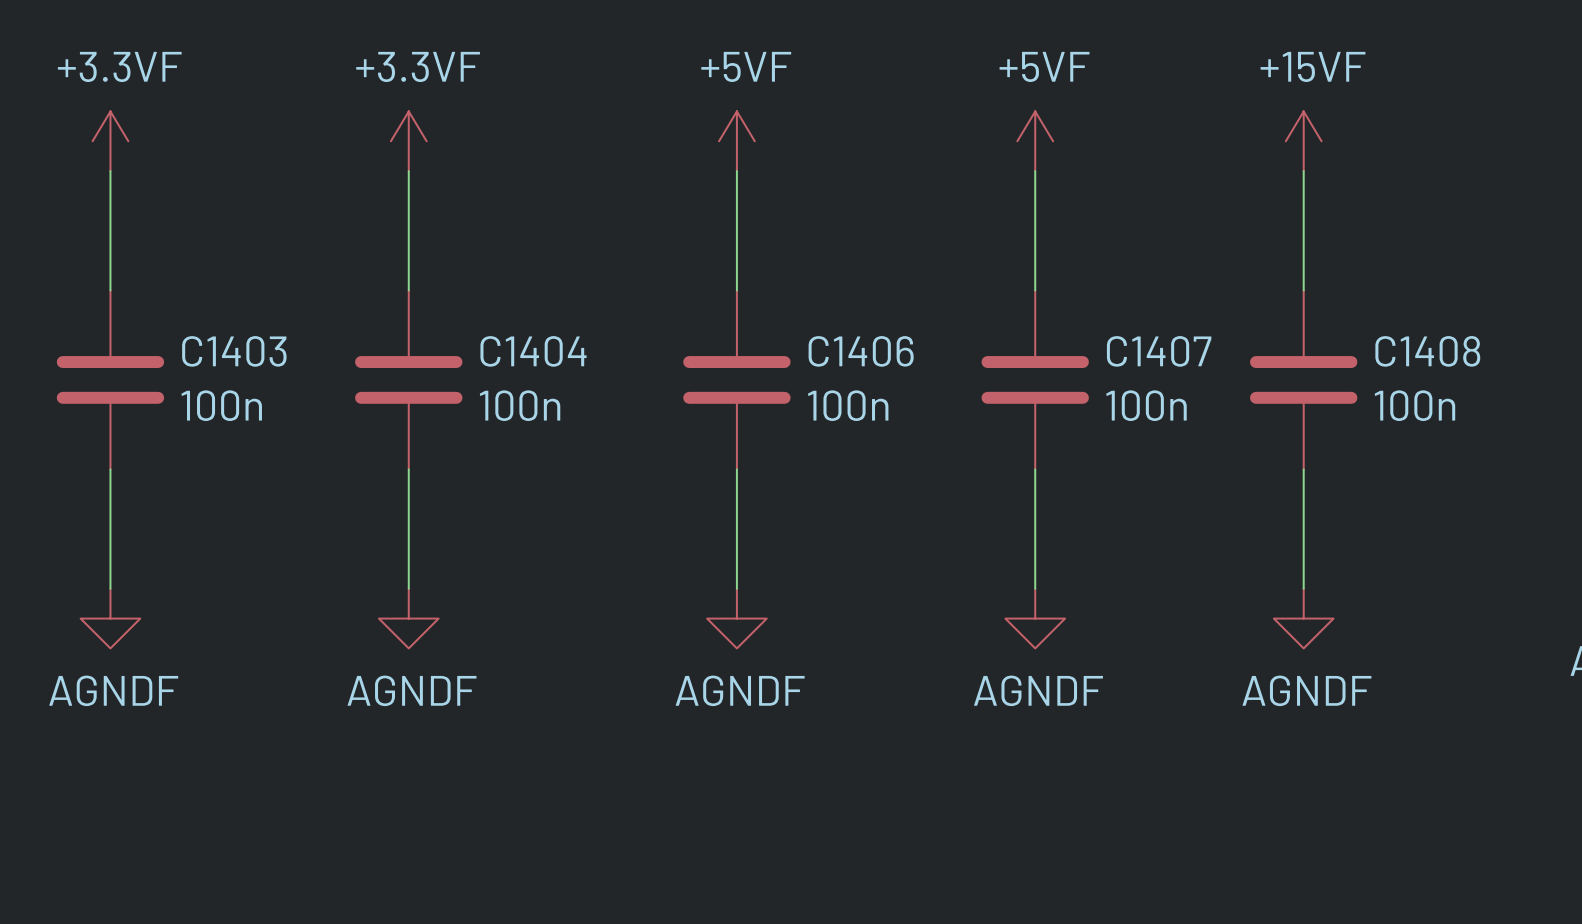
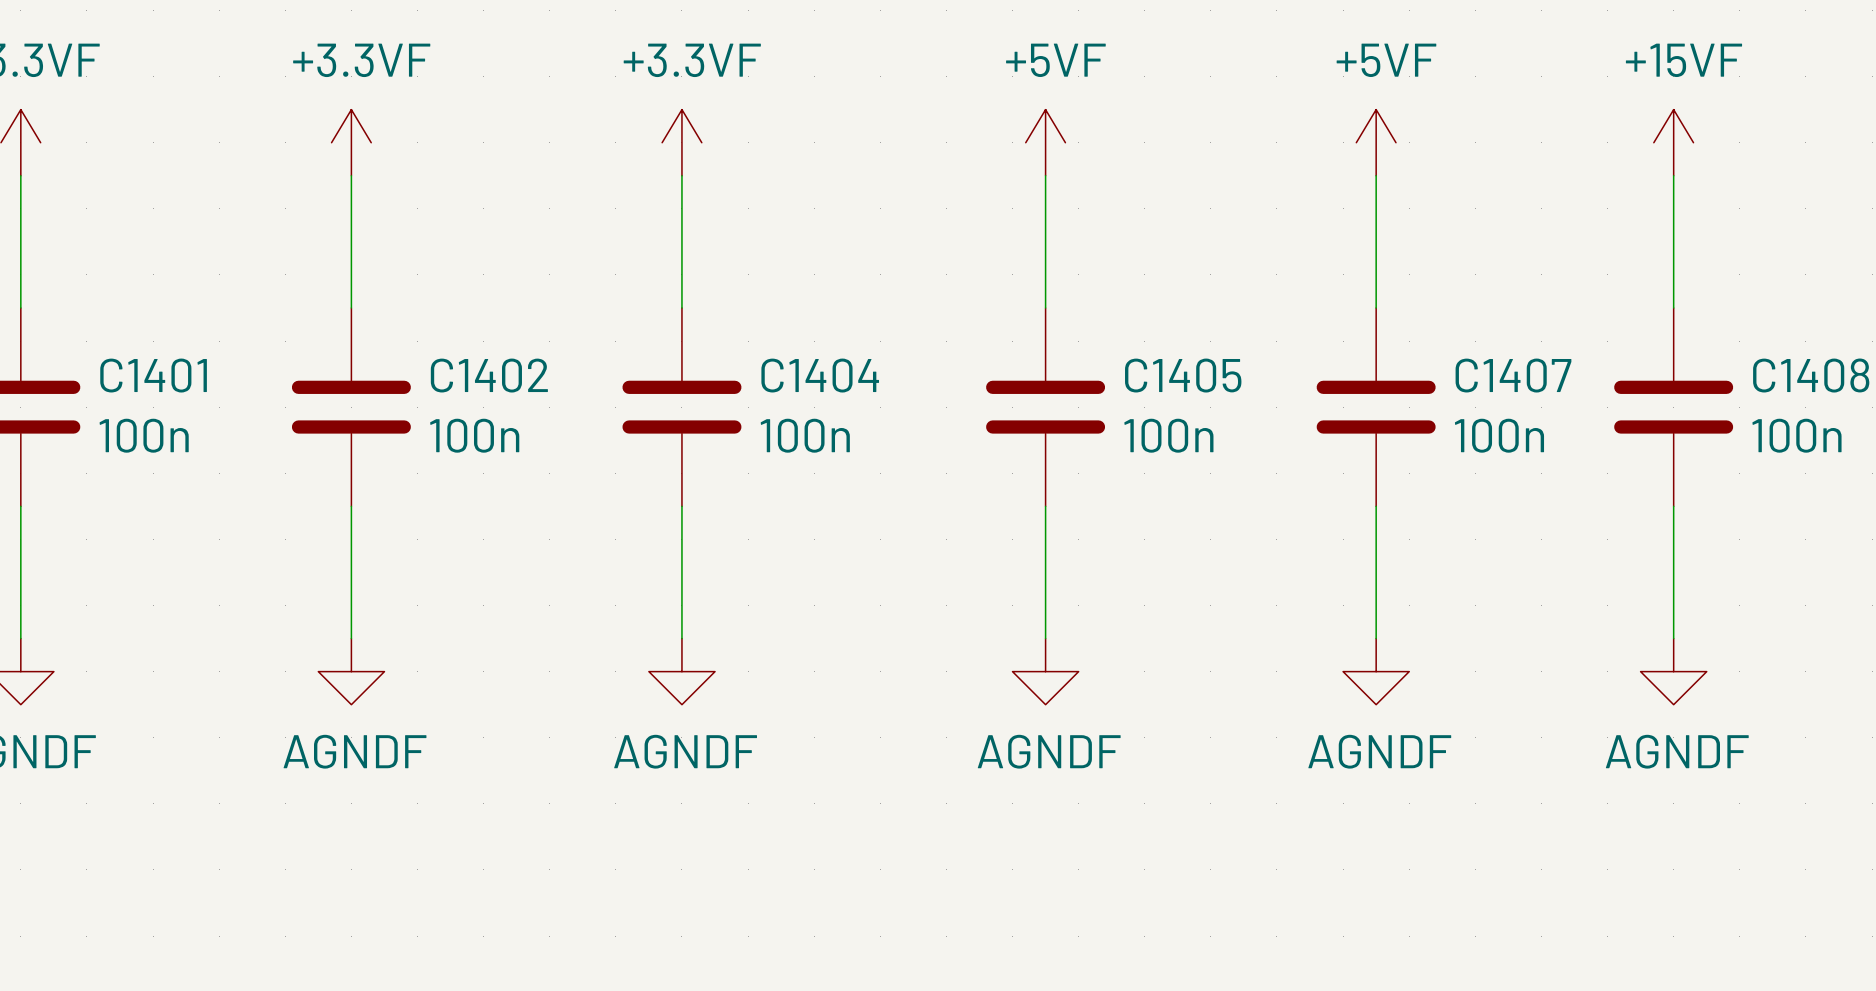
C1403 name: C1403 (234, 351) -> C1402 (489, 375)
C1406 name: C1406 (861, 351) -> C1405 (1183, 375)

